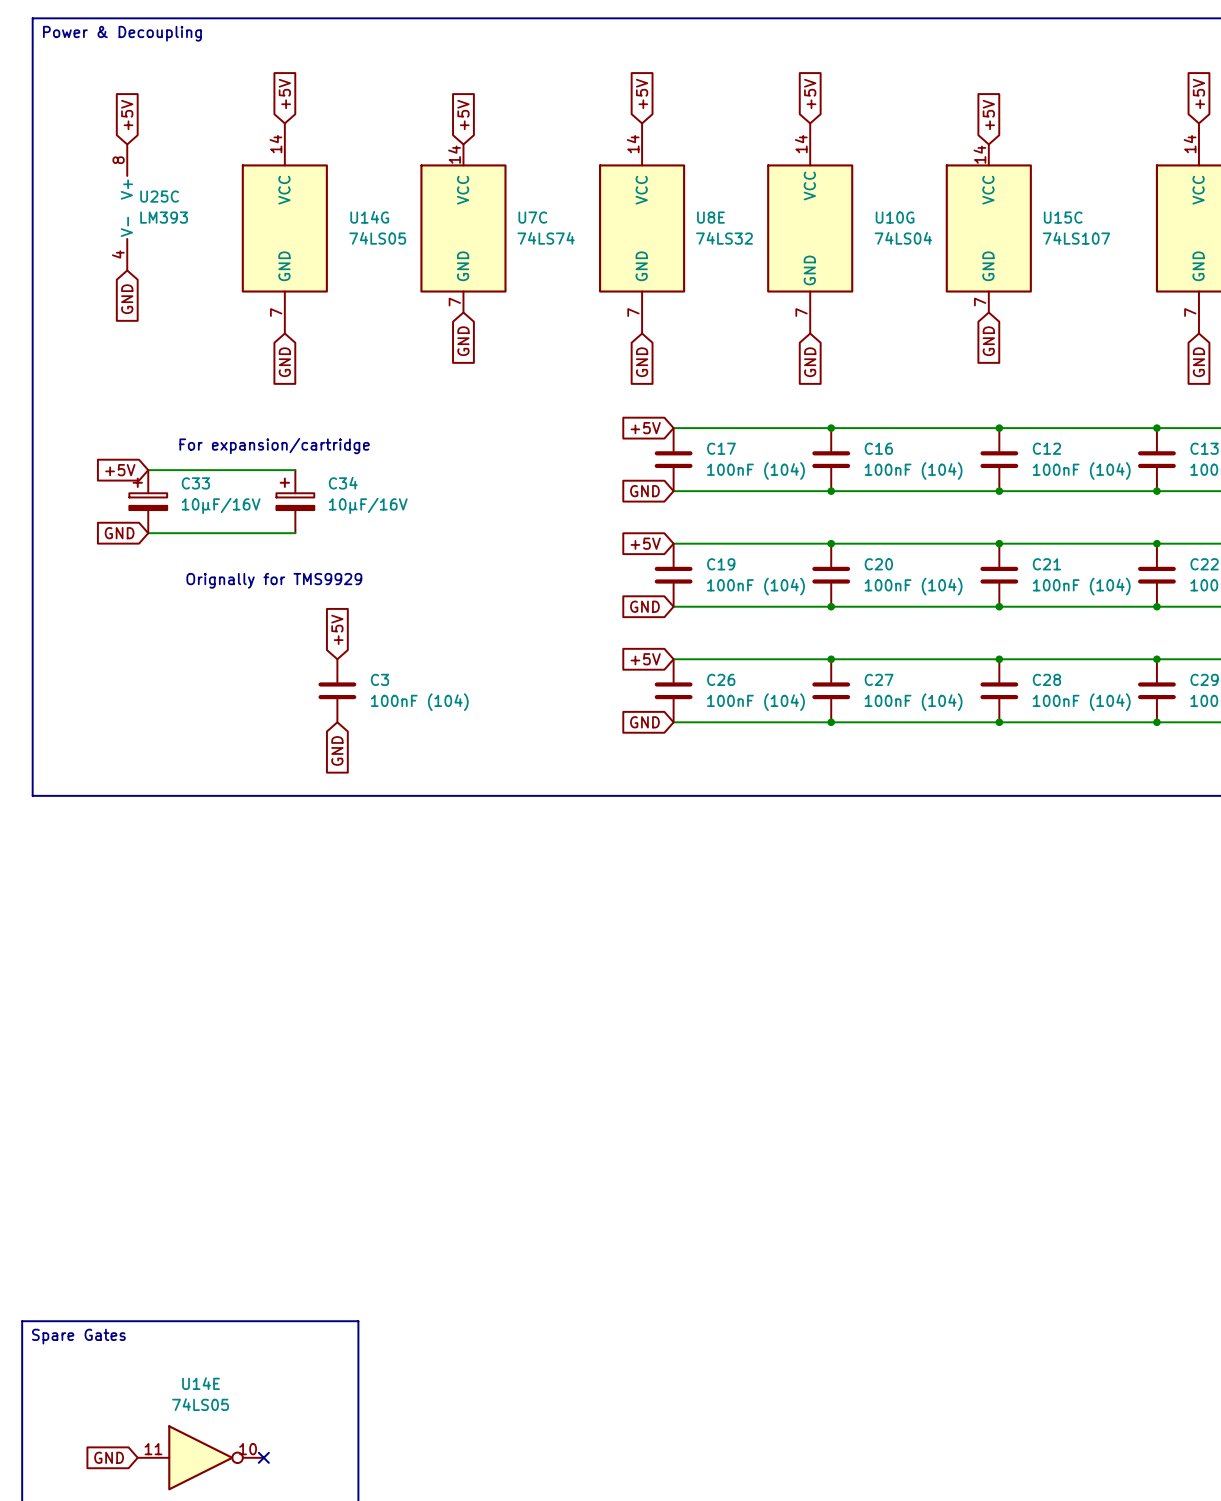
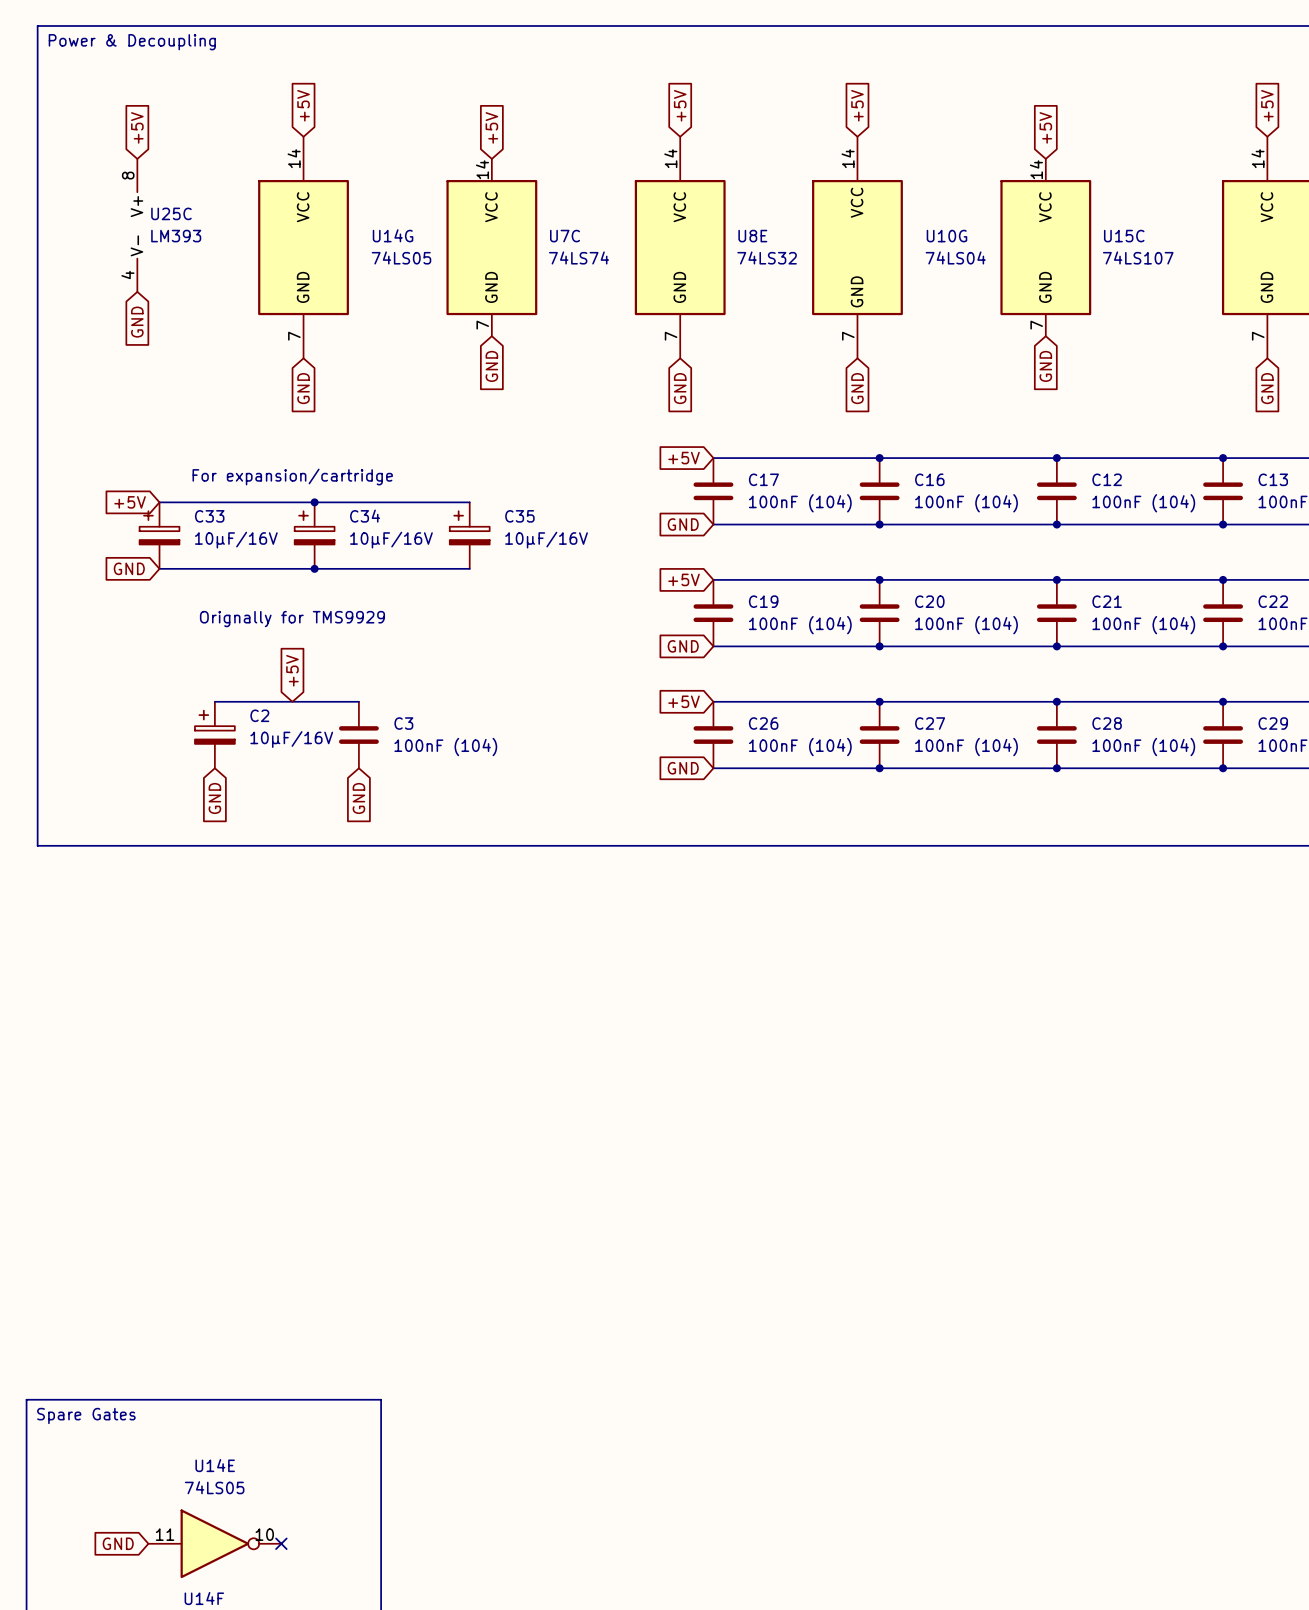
wire: none -> (314, 502) (469, 502)
junction: none -> (314, 502)
C35: none -> 10µF/16V (469, 535)
wire: none -> (314, 568) (469, 568)
junction: none -> (314, 568)
global label position: +5V (337, 629) -> +5V (292, 670)
wire: none -> (214, 701) (358, 701)
C2: none -> 10µF/16V (214, 735)
global label: none -> GND (214, 798)

